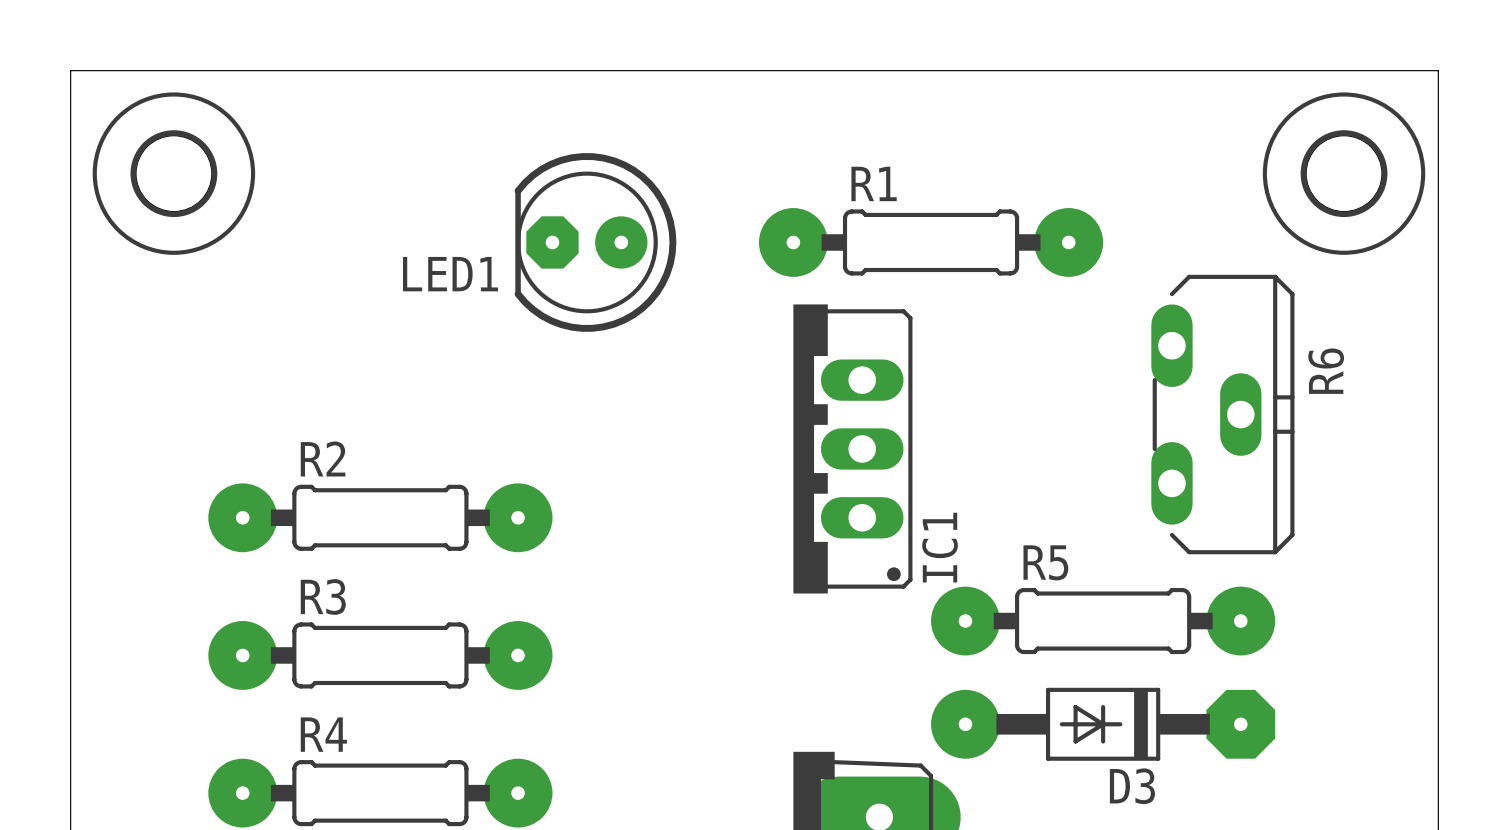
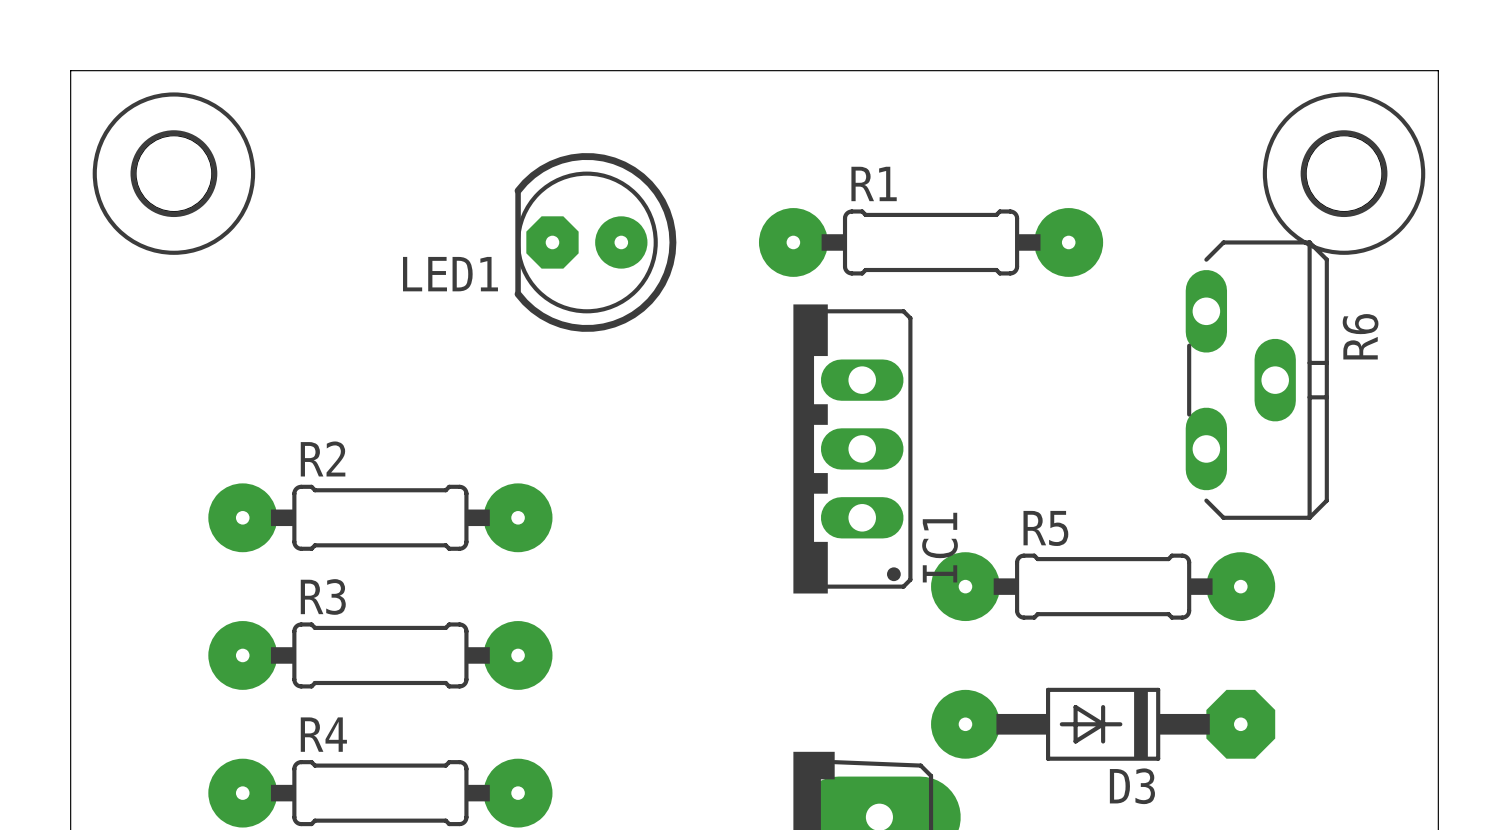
R6 position: (1222, 414) -> (1257, 380)
R5 position: (1103, 621) -> (1103, 586)

